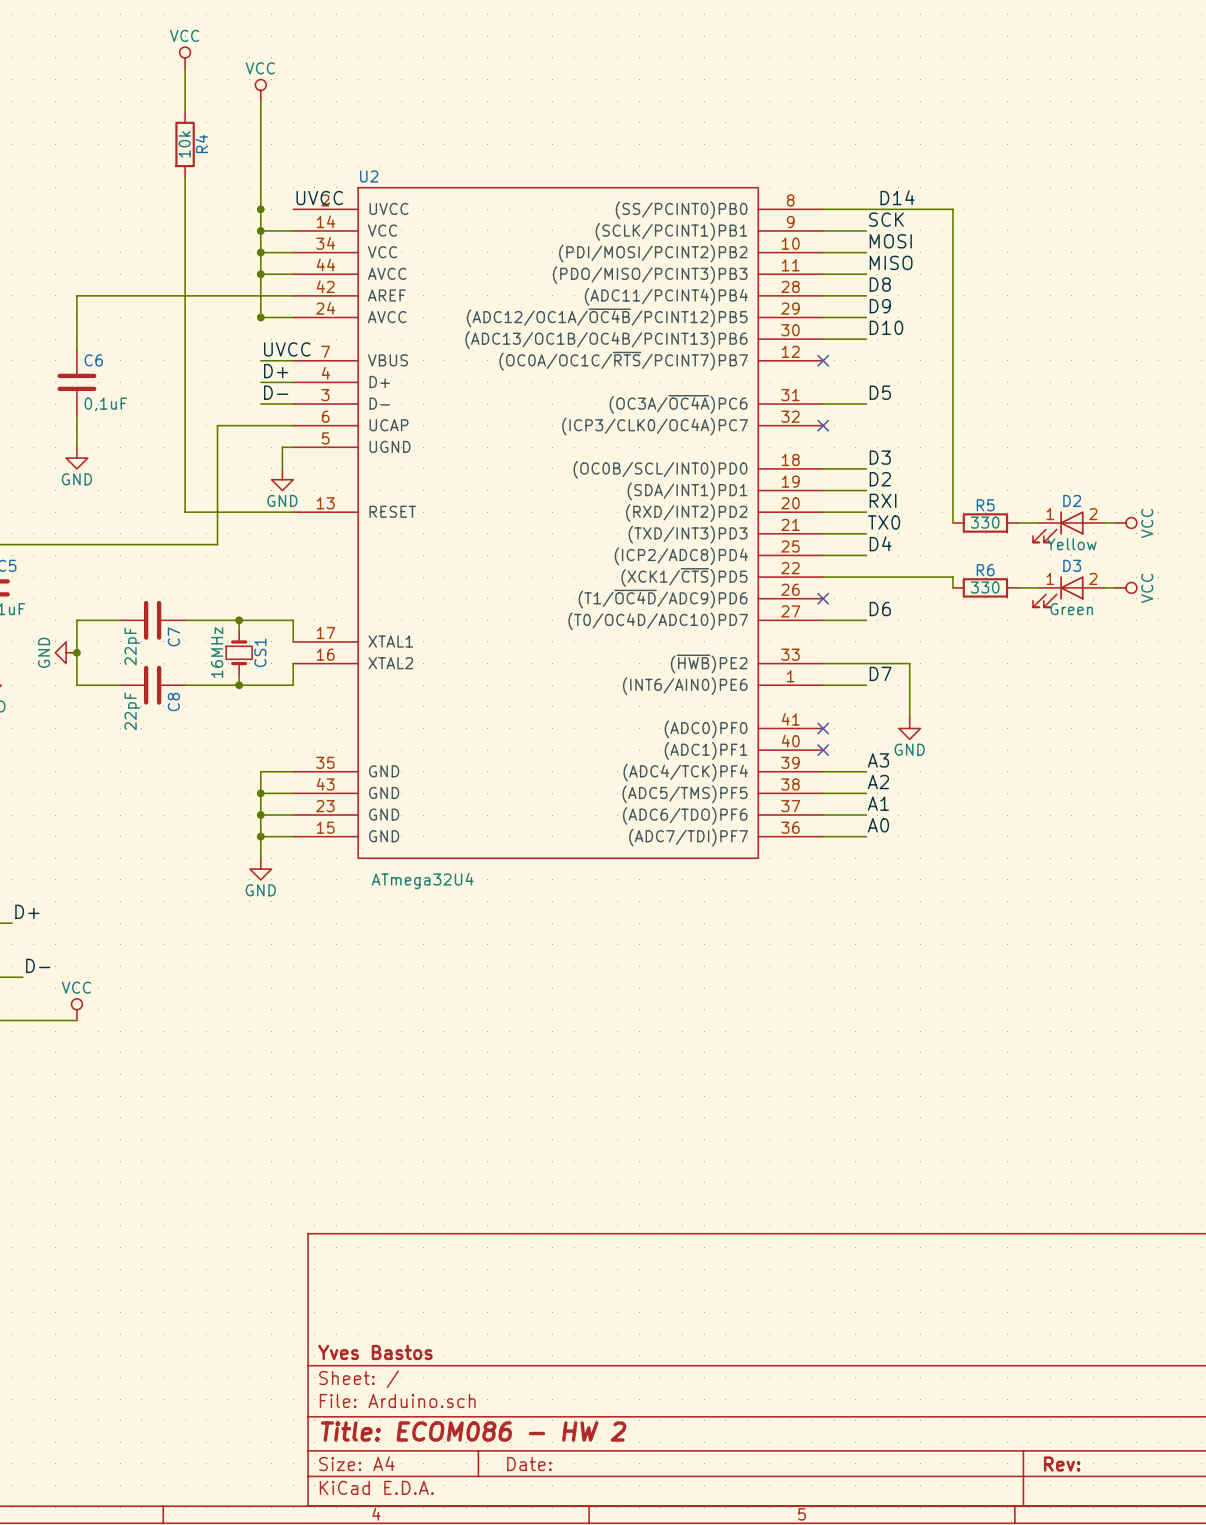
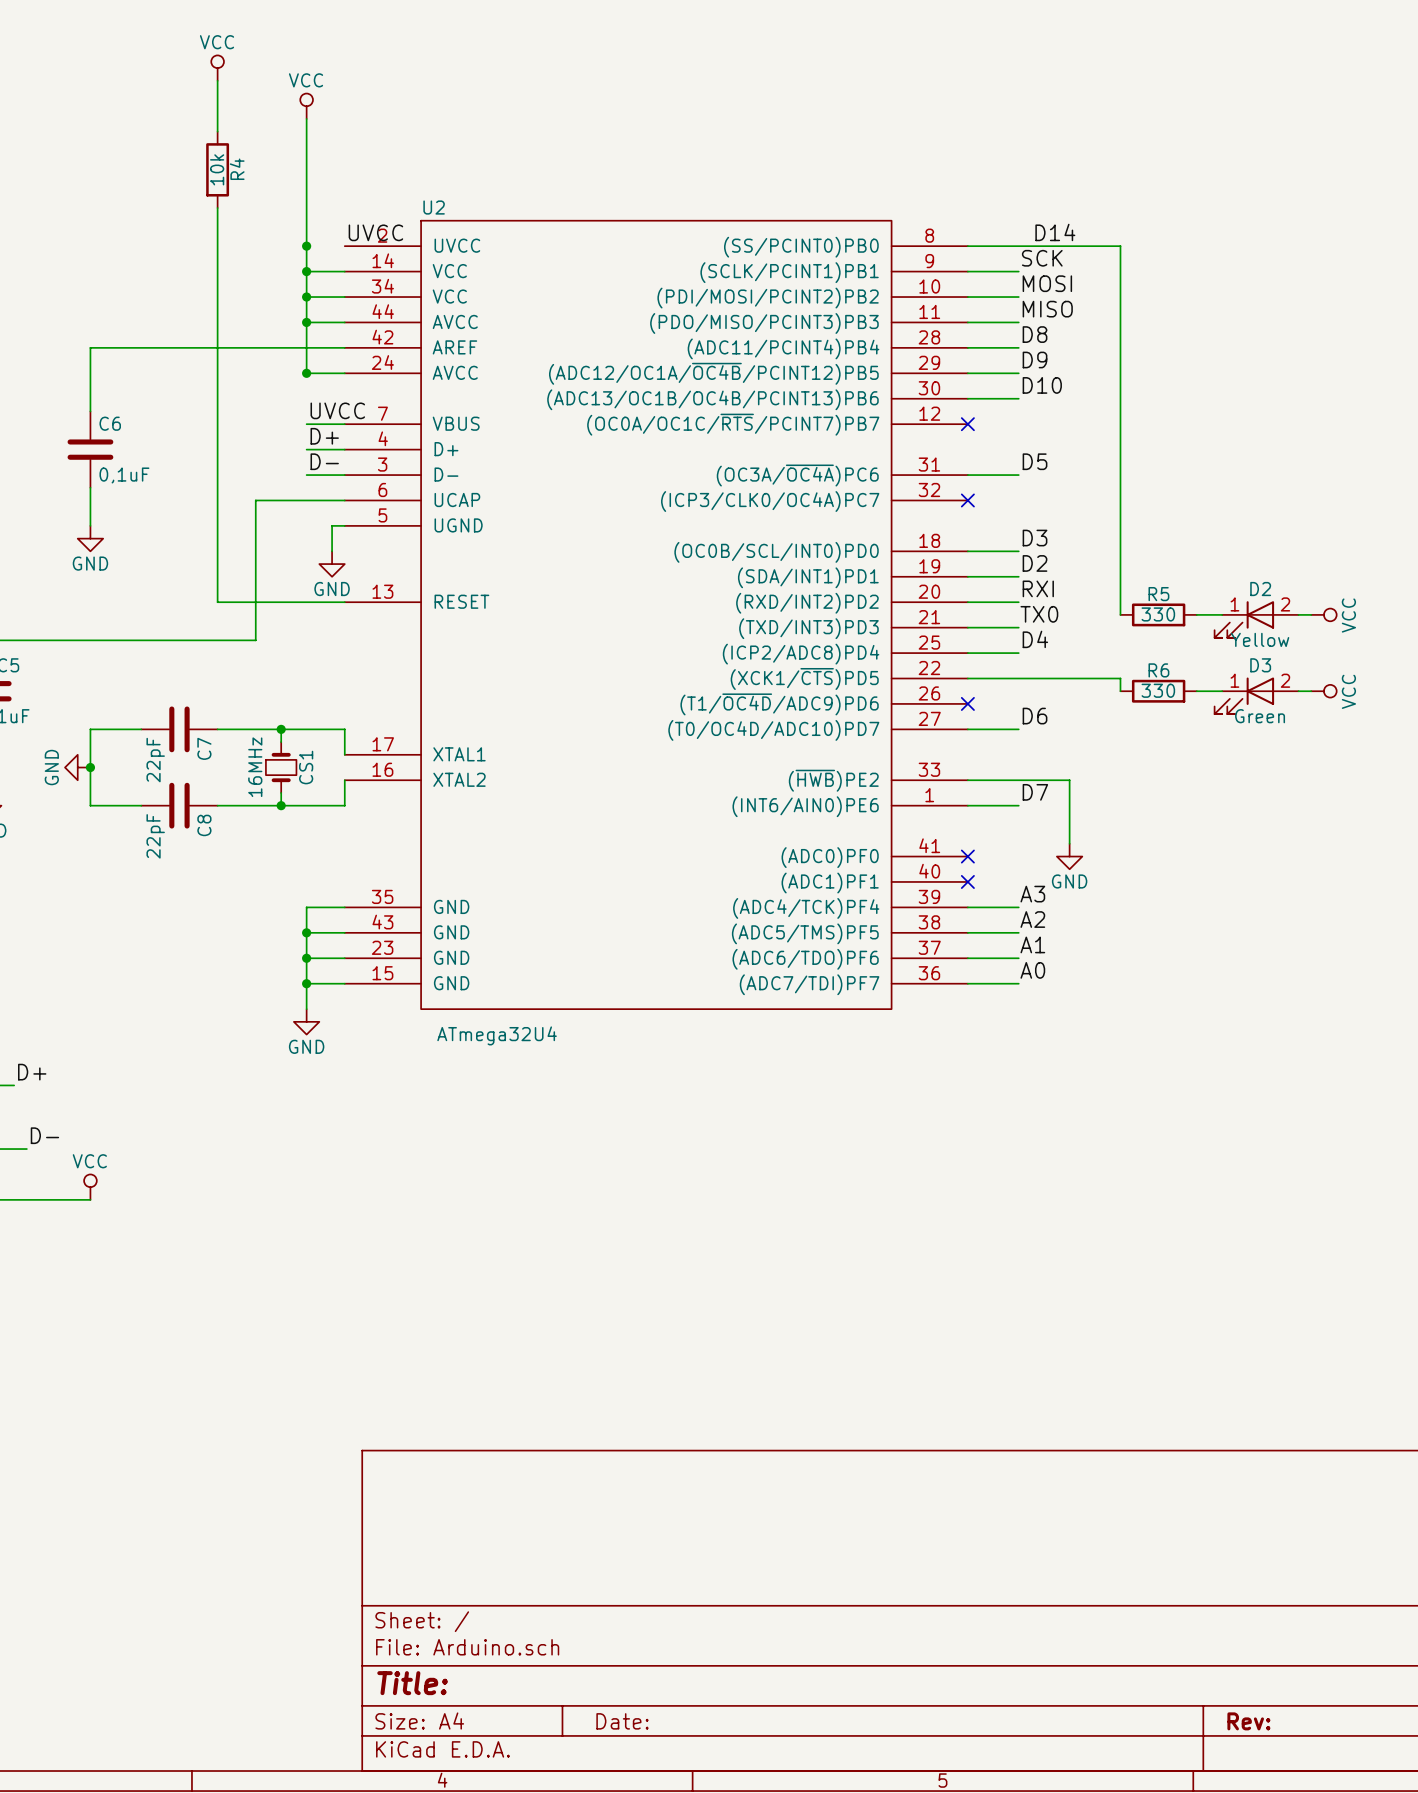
title block: Yves Bastos (375, 1352) -> none
title block: Title: ECOM086 - HW 2 (473, 1431) -> Title: (412, 1683)

